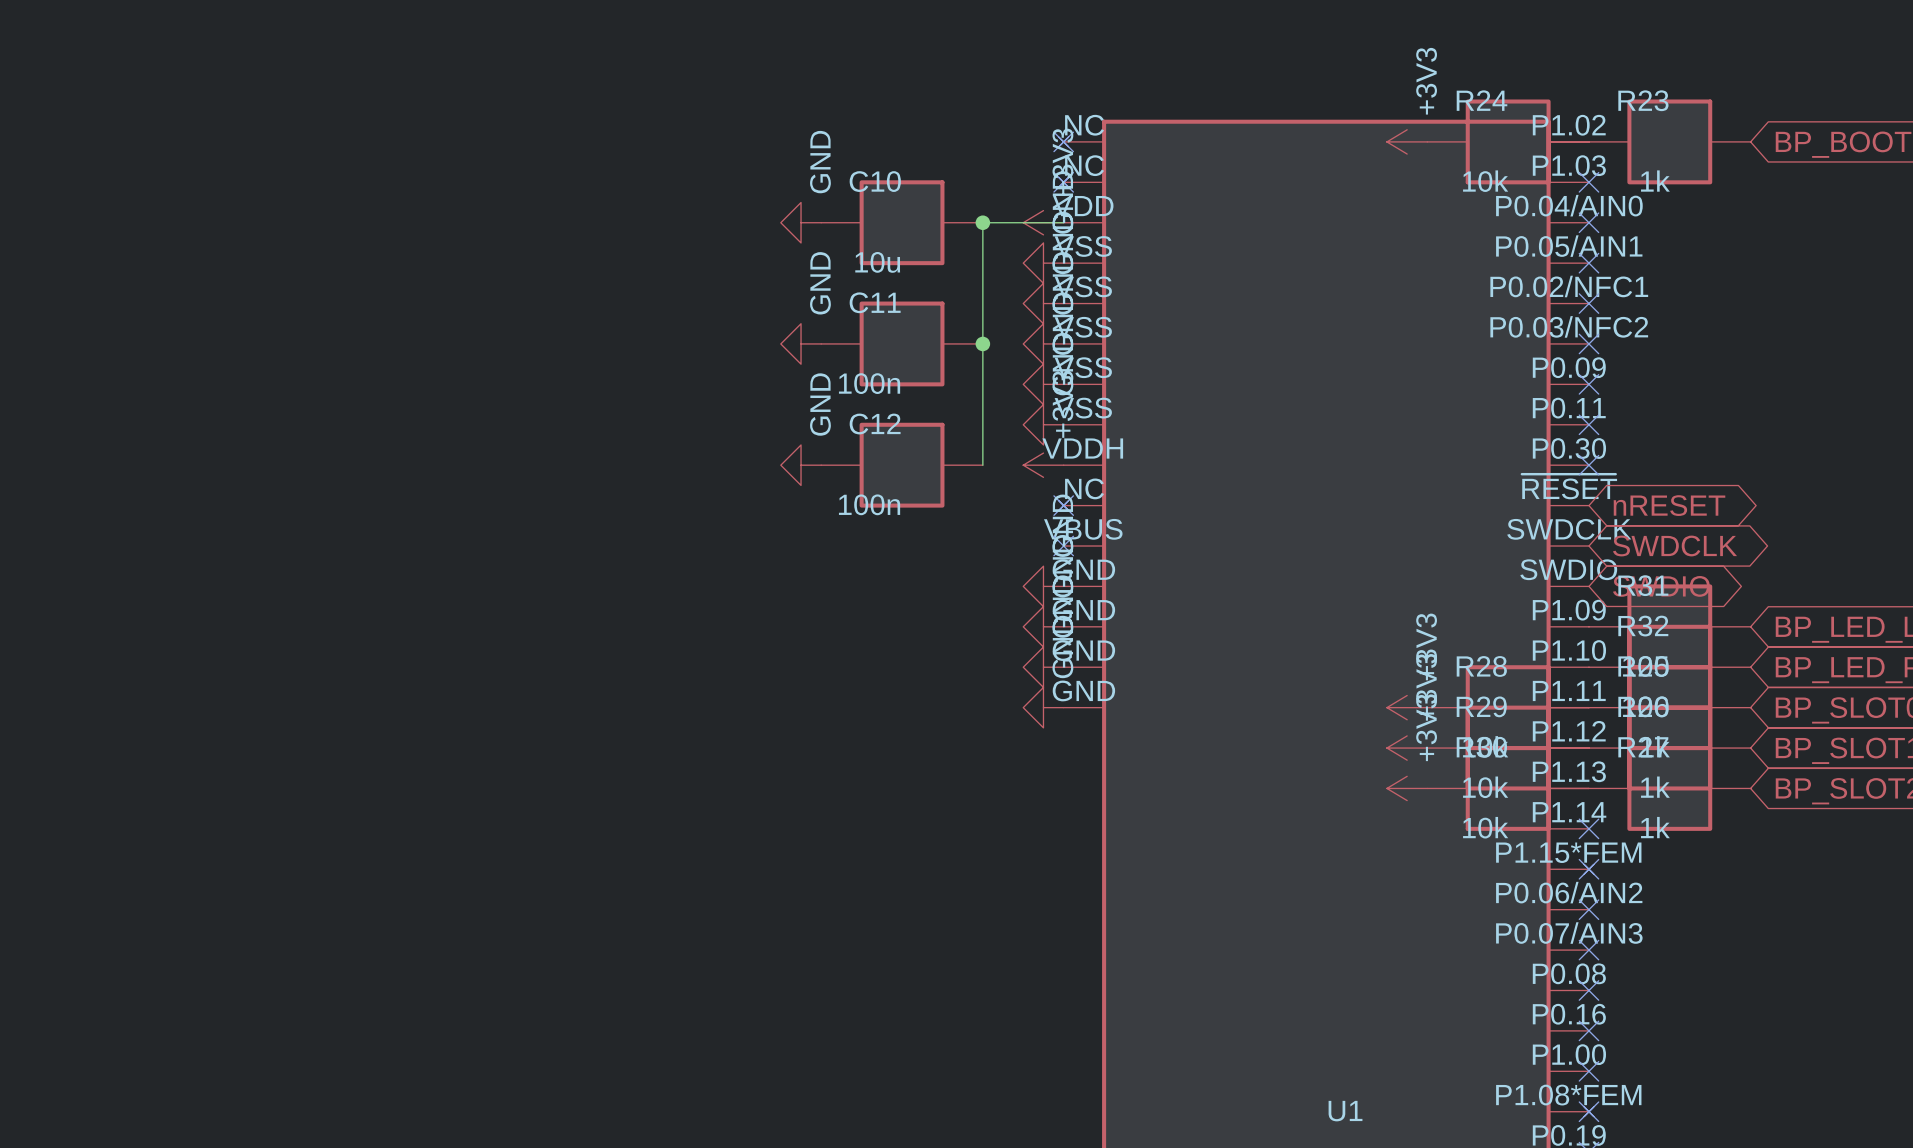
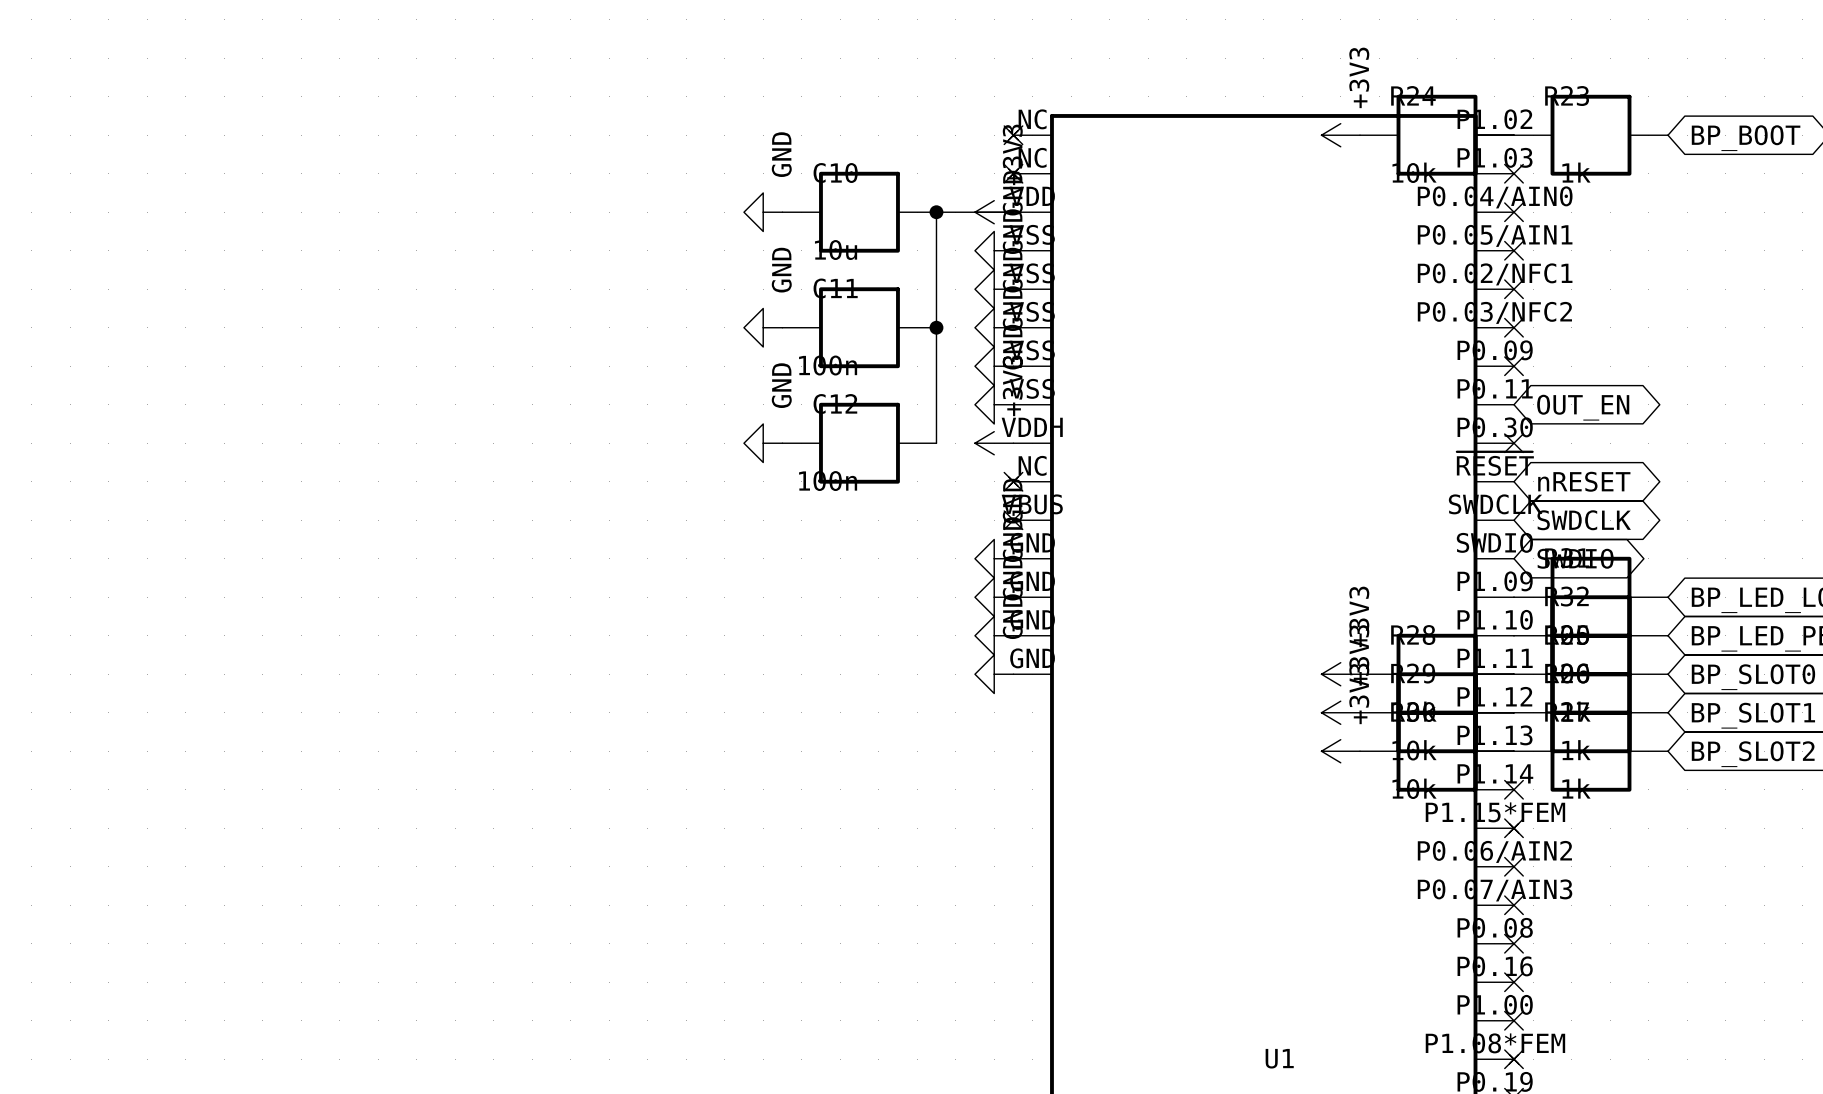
no-connect mark: (1588, 424) -> none
global label: none -> OUT_EN (1583, 407)

